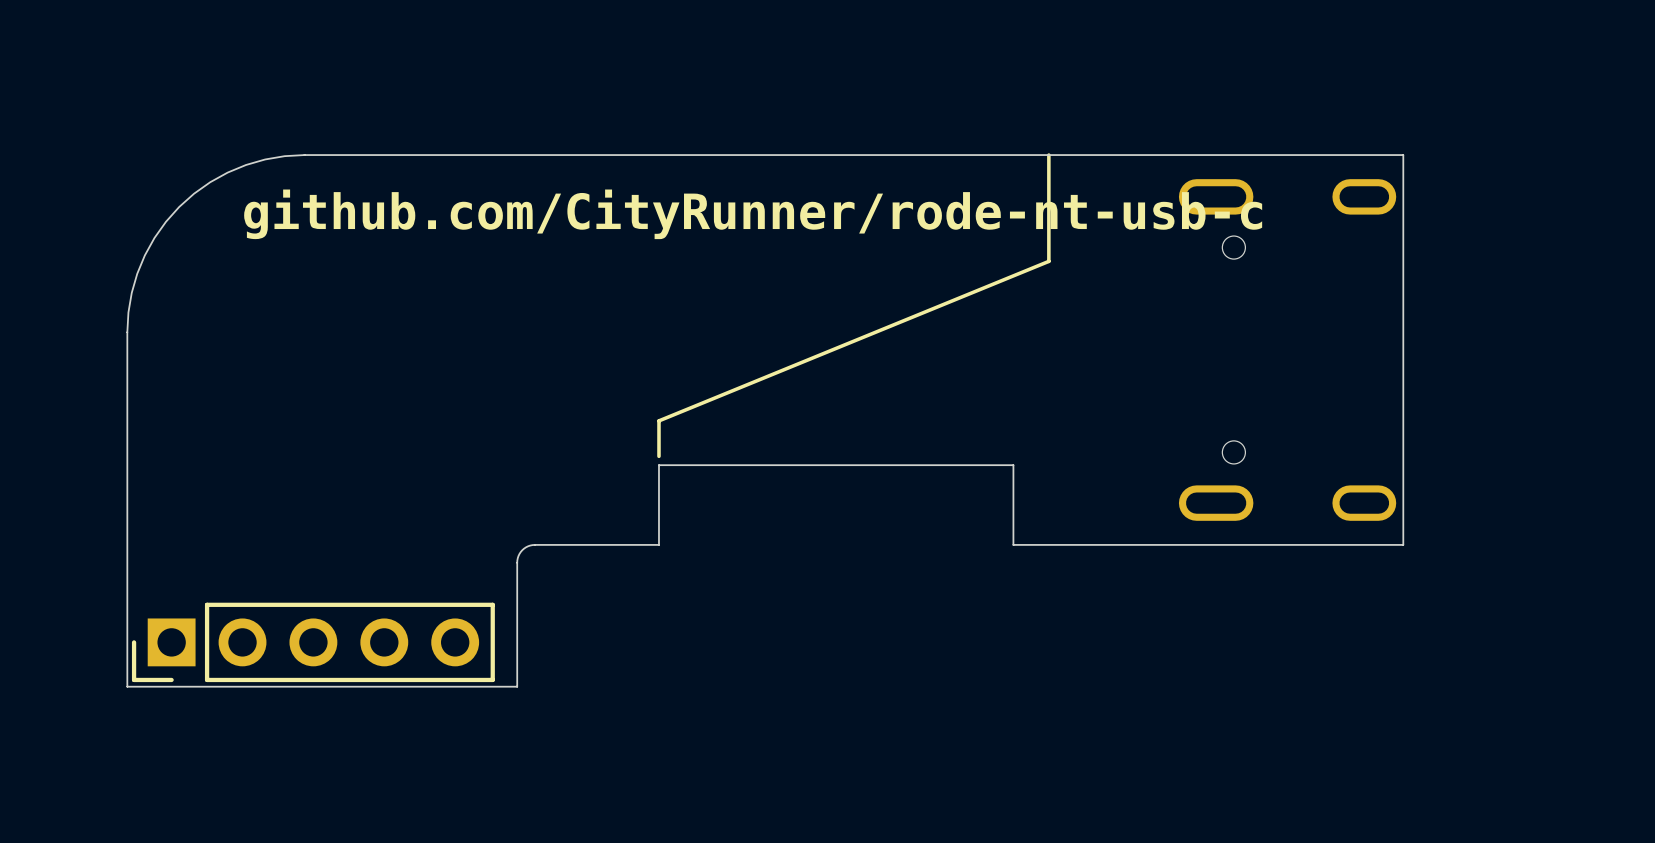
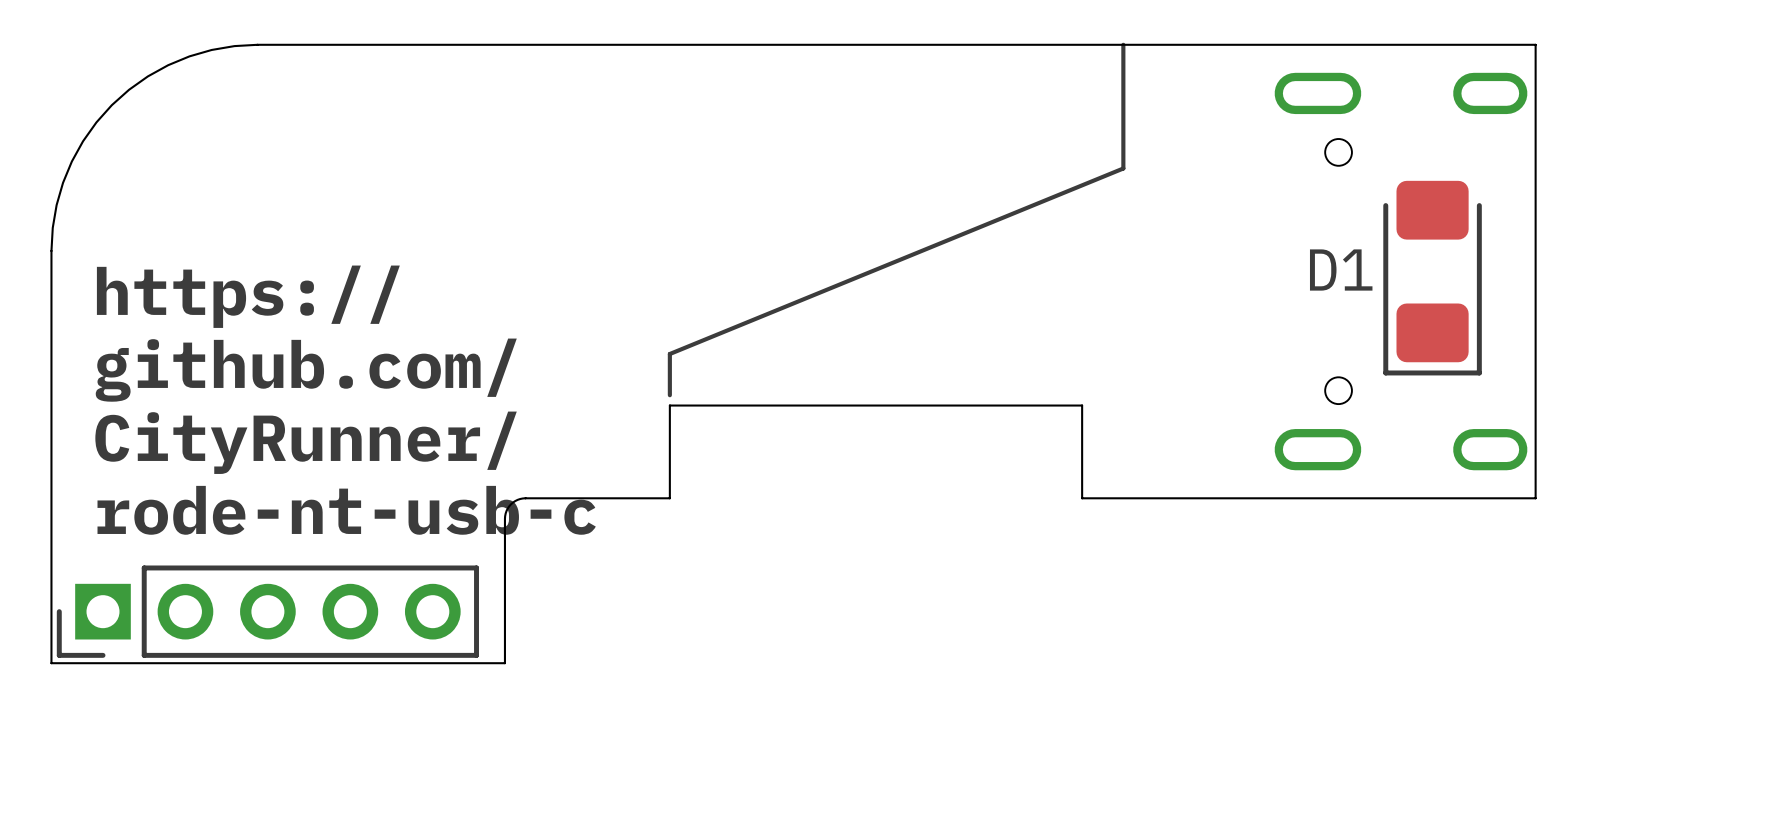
text: github.com/CityRunner/rode-nt-usb-c (753, 214) -> none
D1: none -> (1432, 278)
text: none -> https:// (248, 296)
text: none -> github.com/ (306, 370)
text: none -> CityRunner/ (306, 442)
text: none -> rode-nt-usb-c (346, 510)

